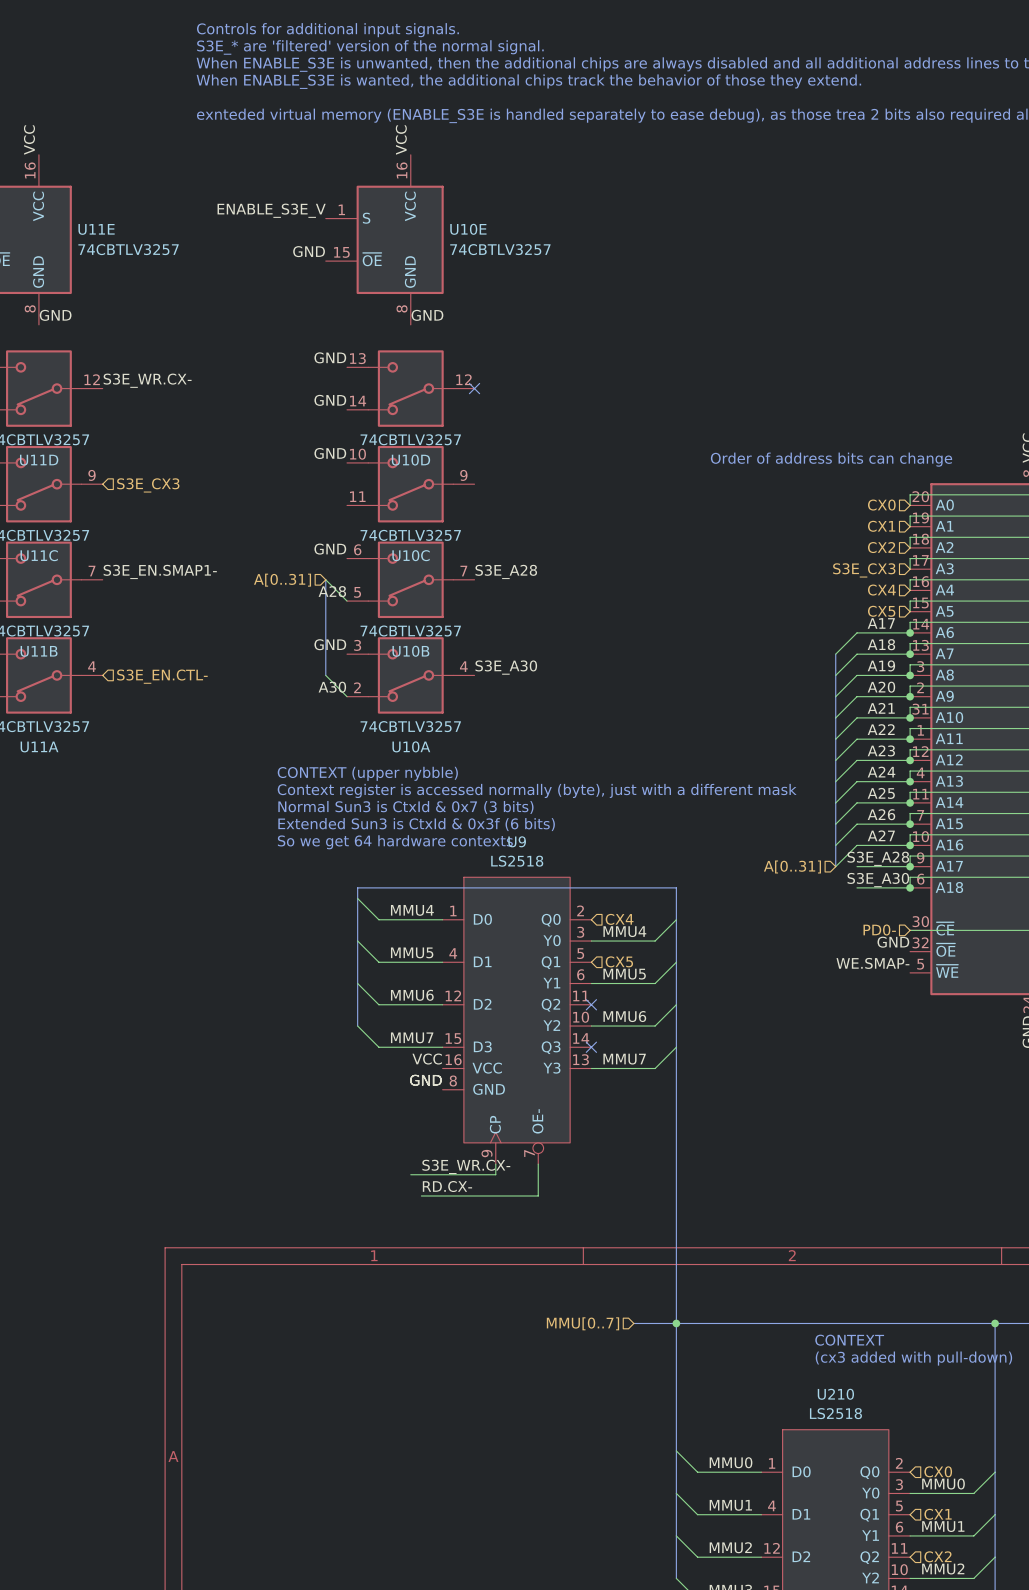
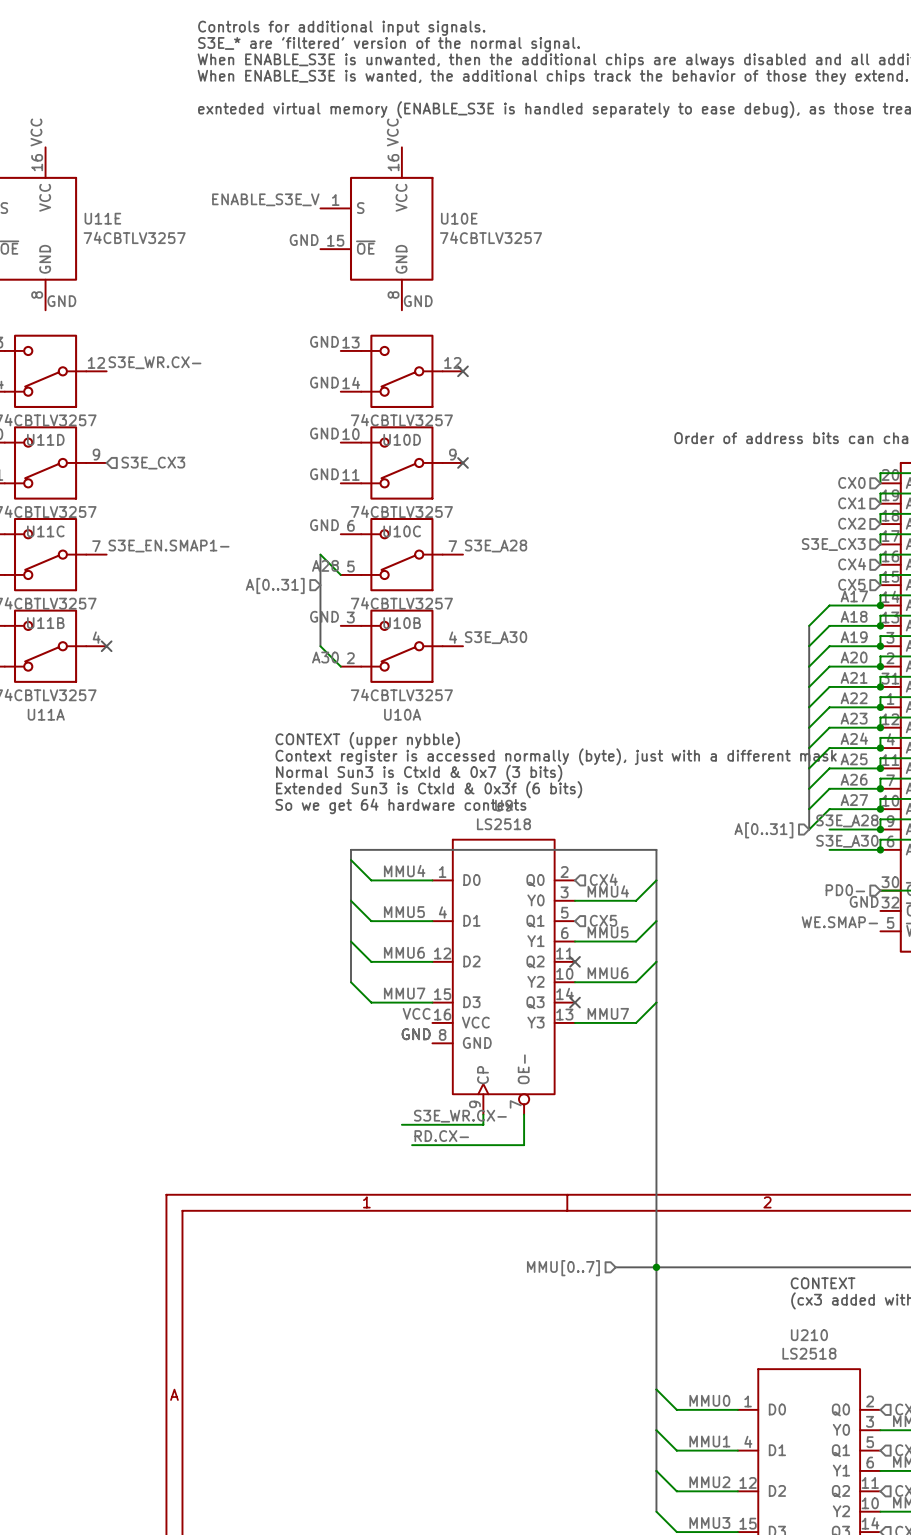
no-connect mark: none -> (462, 462)
label: none -> GND (324, 474)
hierarchical label position: A[0..31] (282, 580) -> A[0..31] (275, 585)
no-connect mark: none -> (106, 646)
hierarchical label: S3E_EN.CTL- (162, 676) -> none

